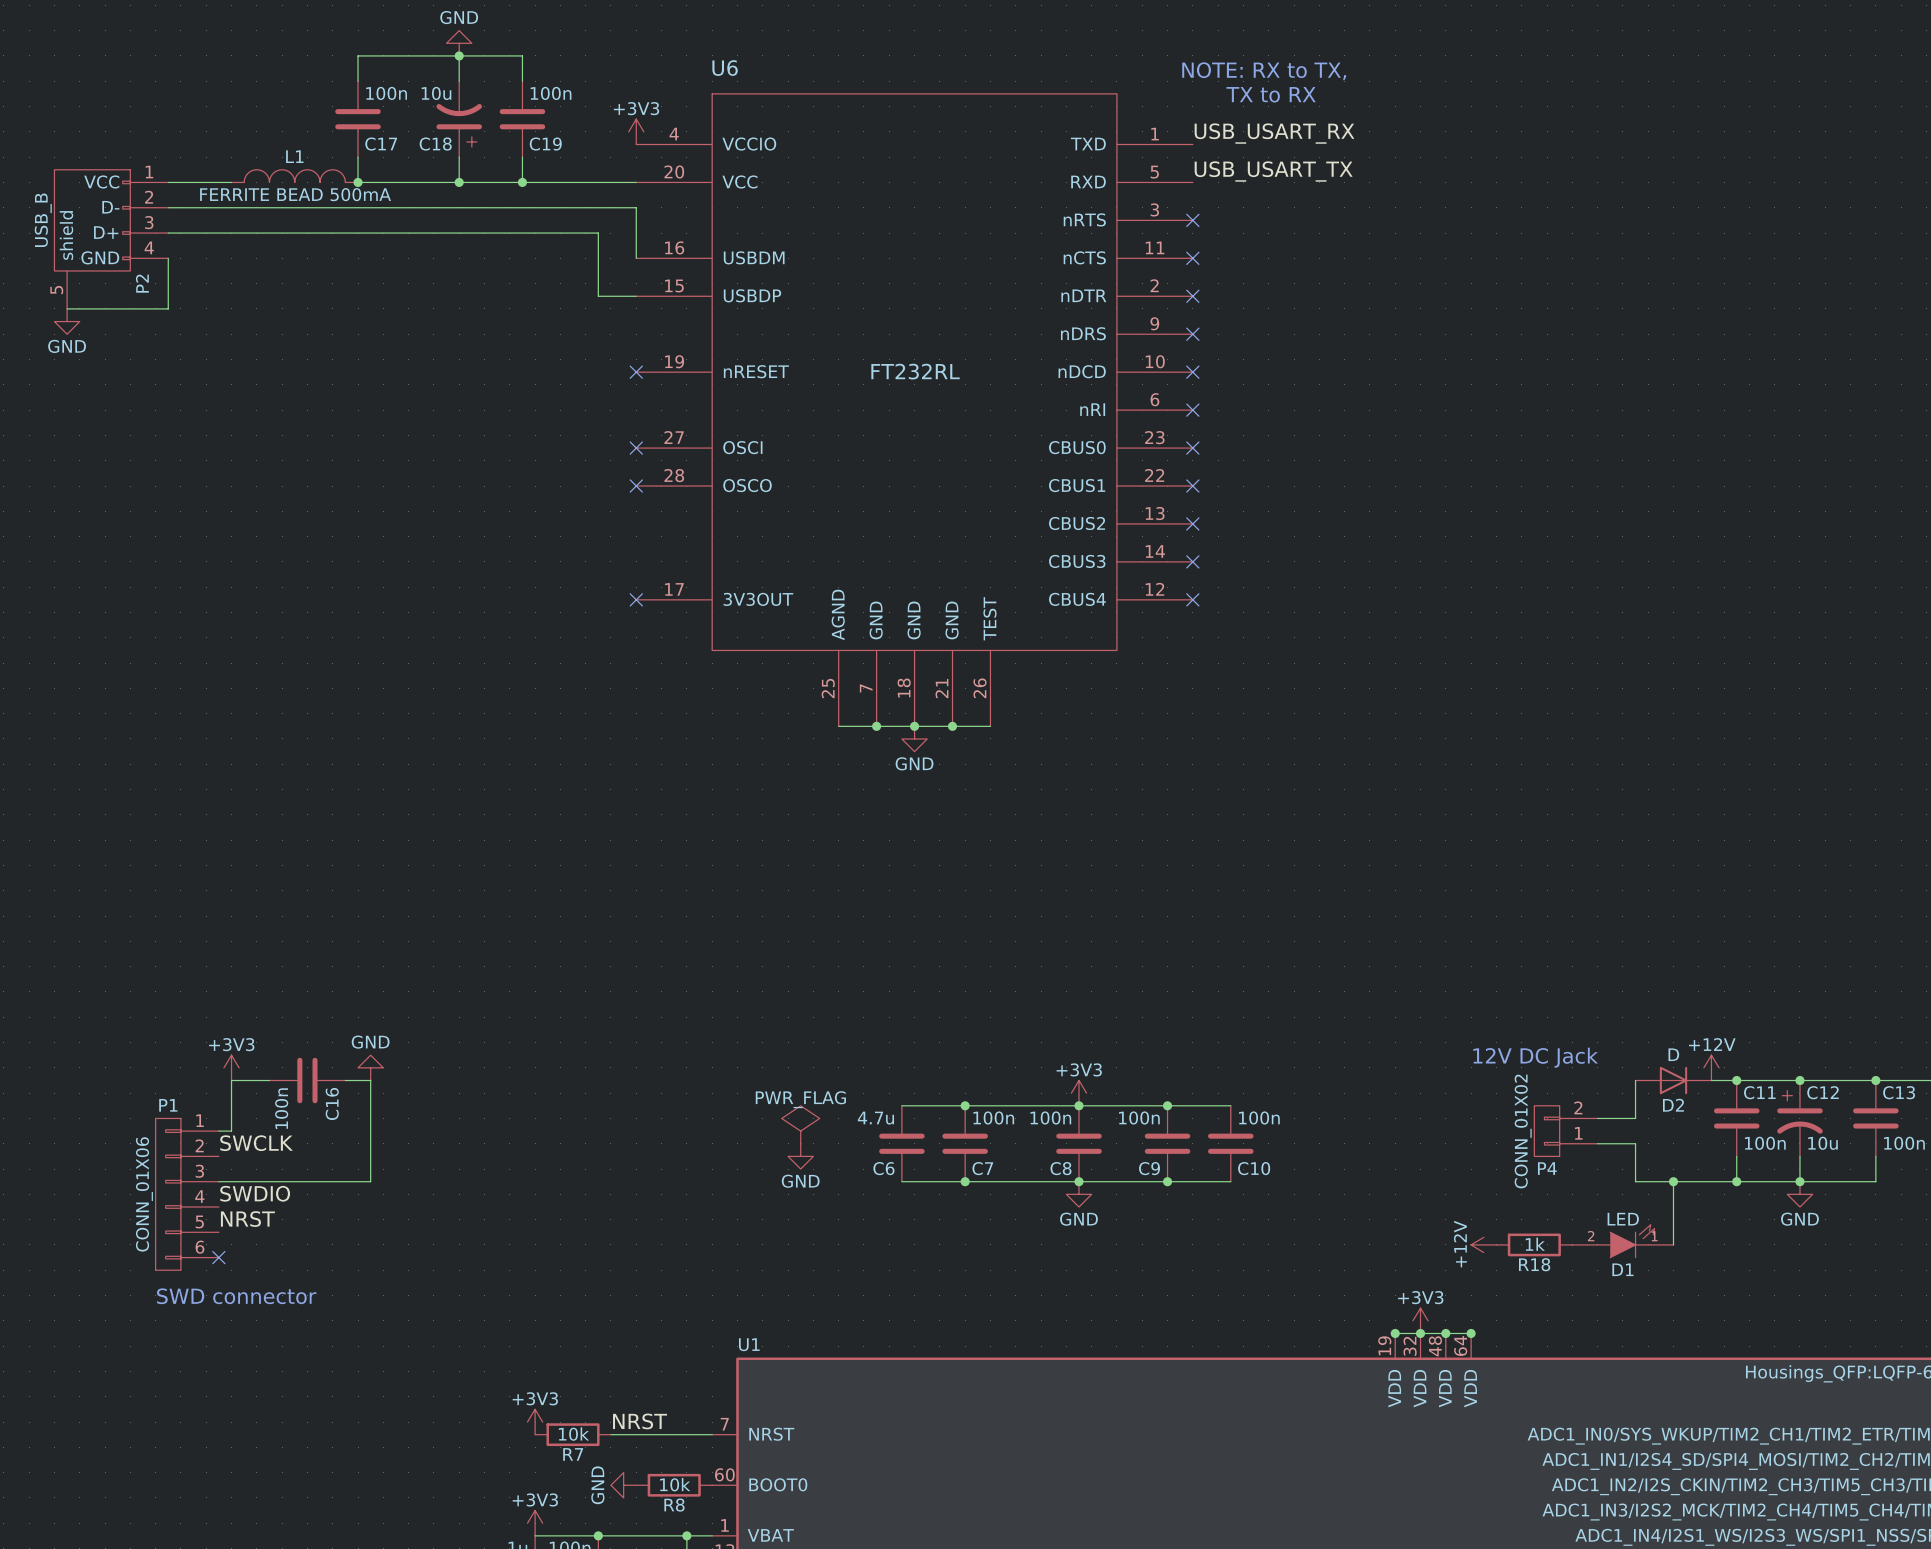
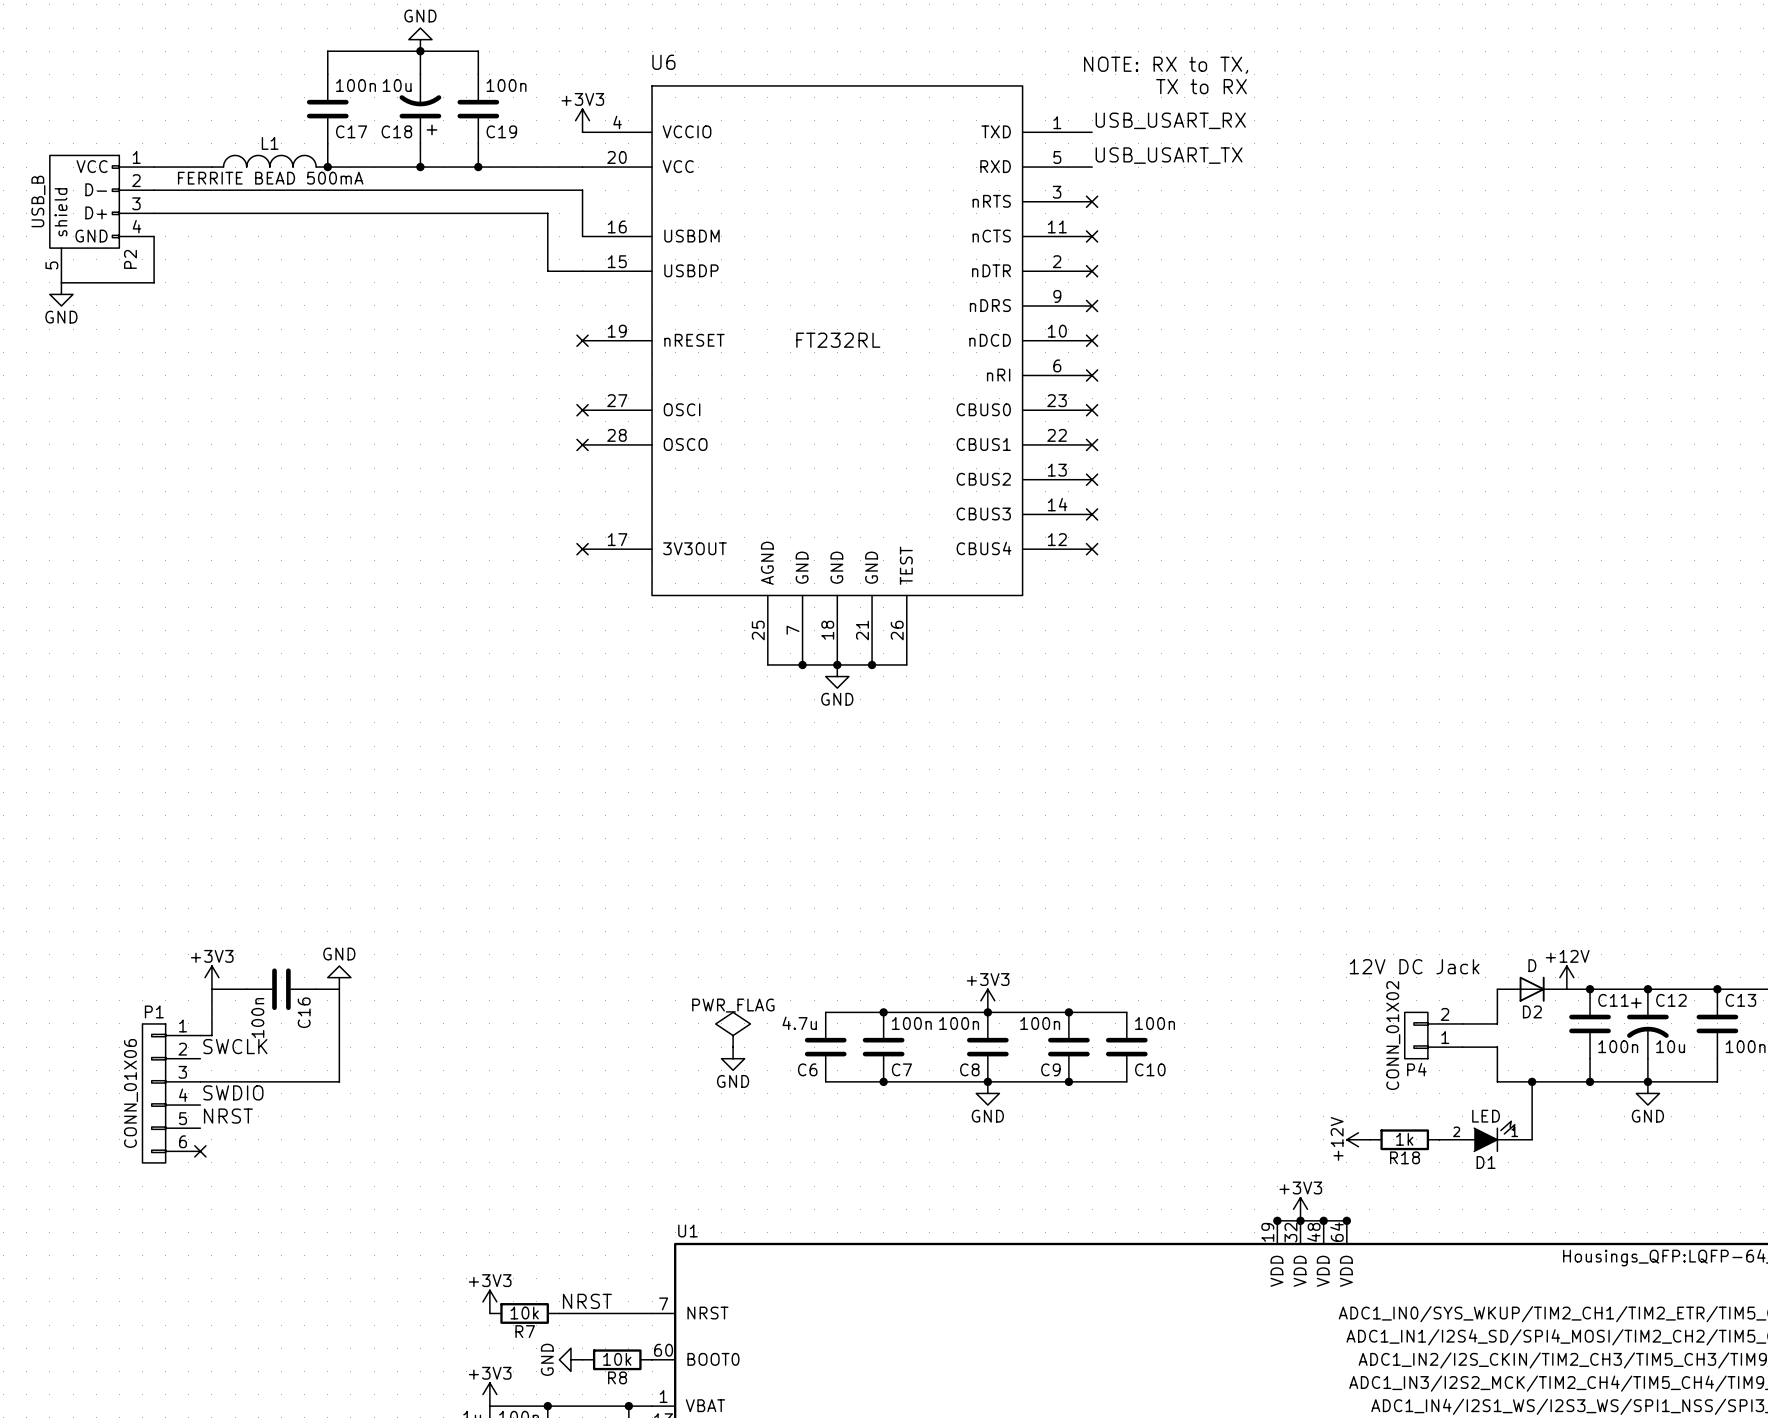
text: SWD connector (236, 1296) -> none

